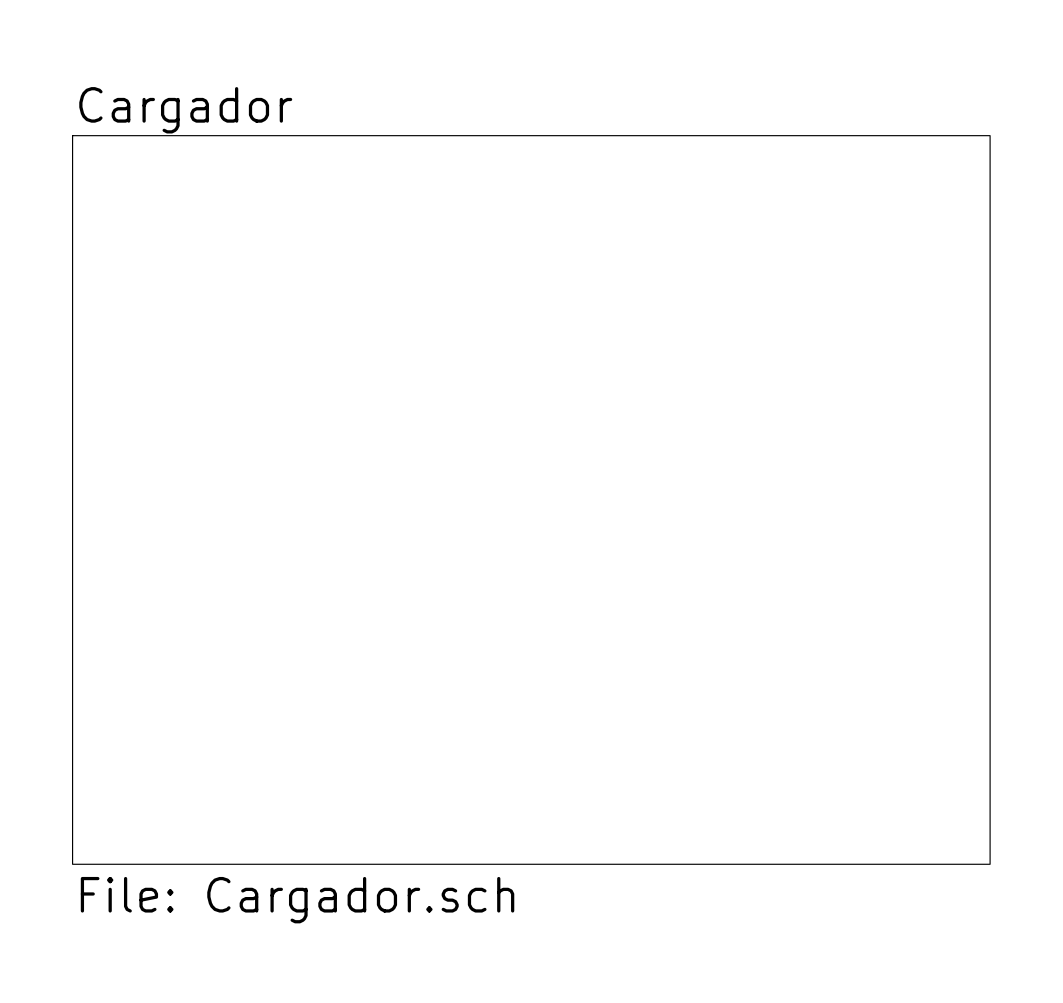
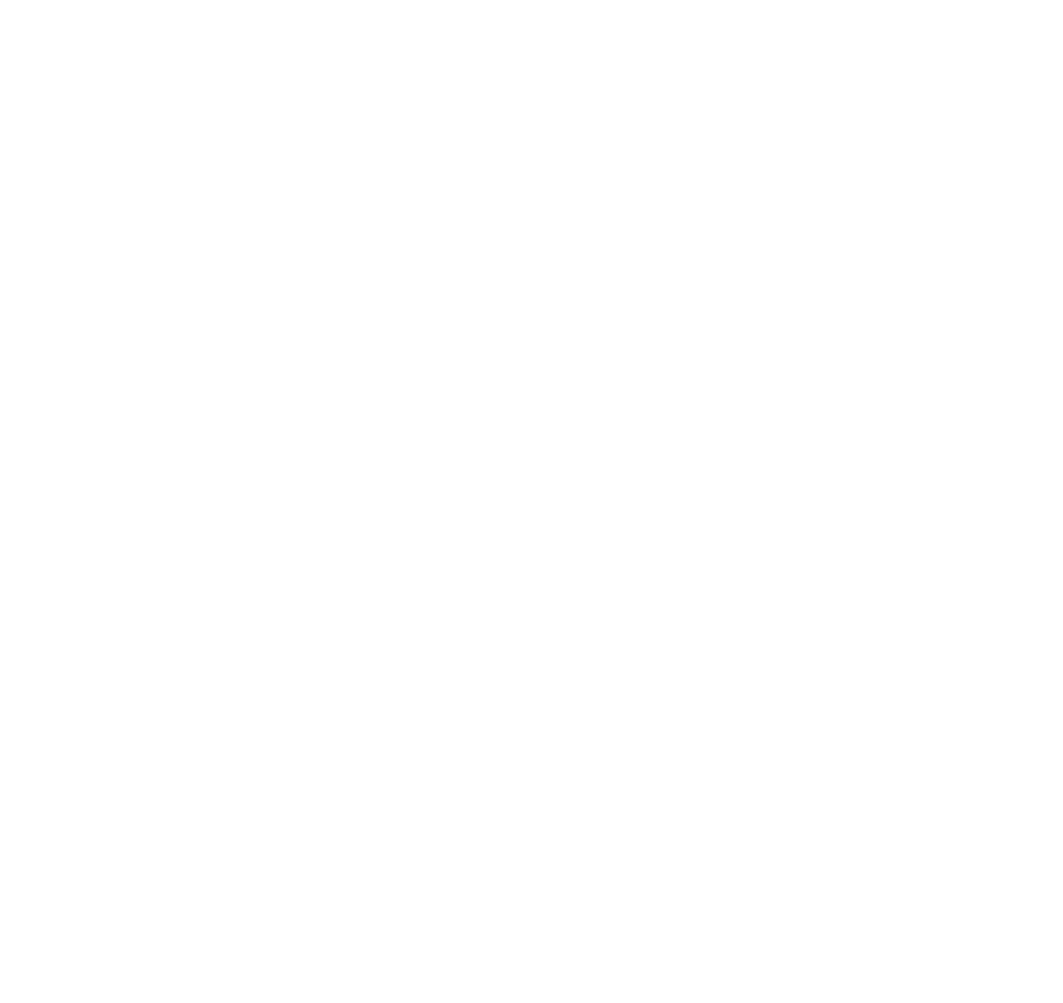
sheet Cargador: File: Cargador.sch (531, 499) -> none

